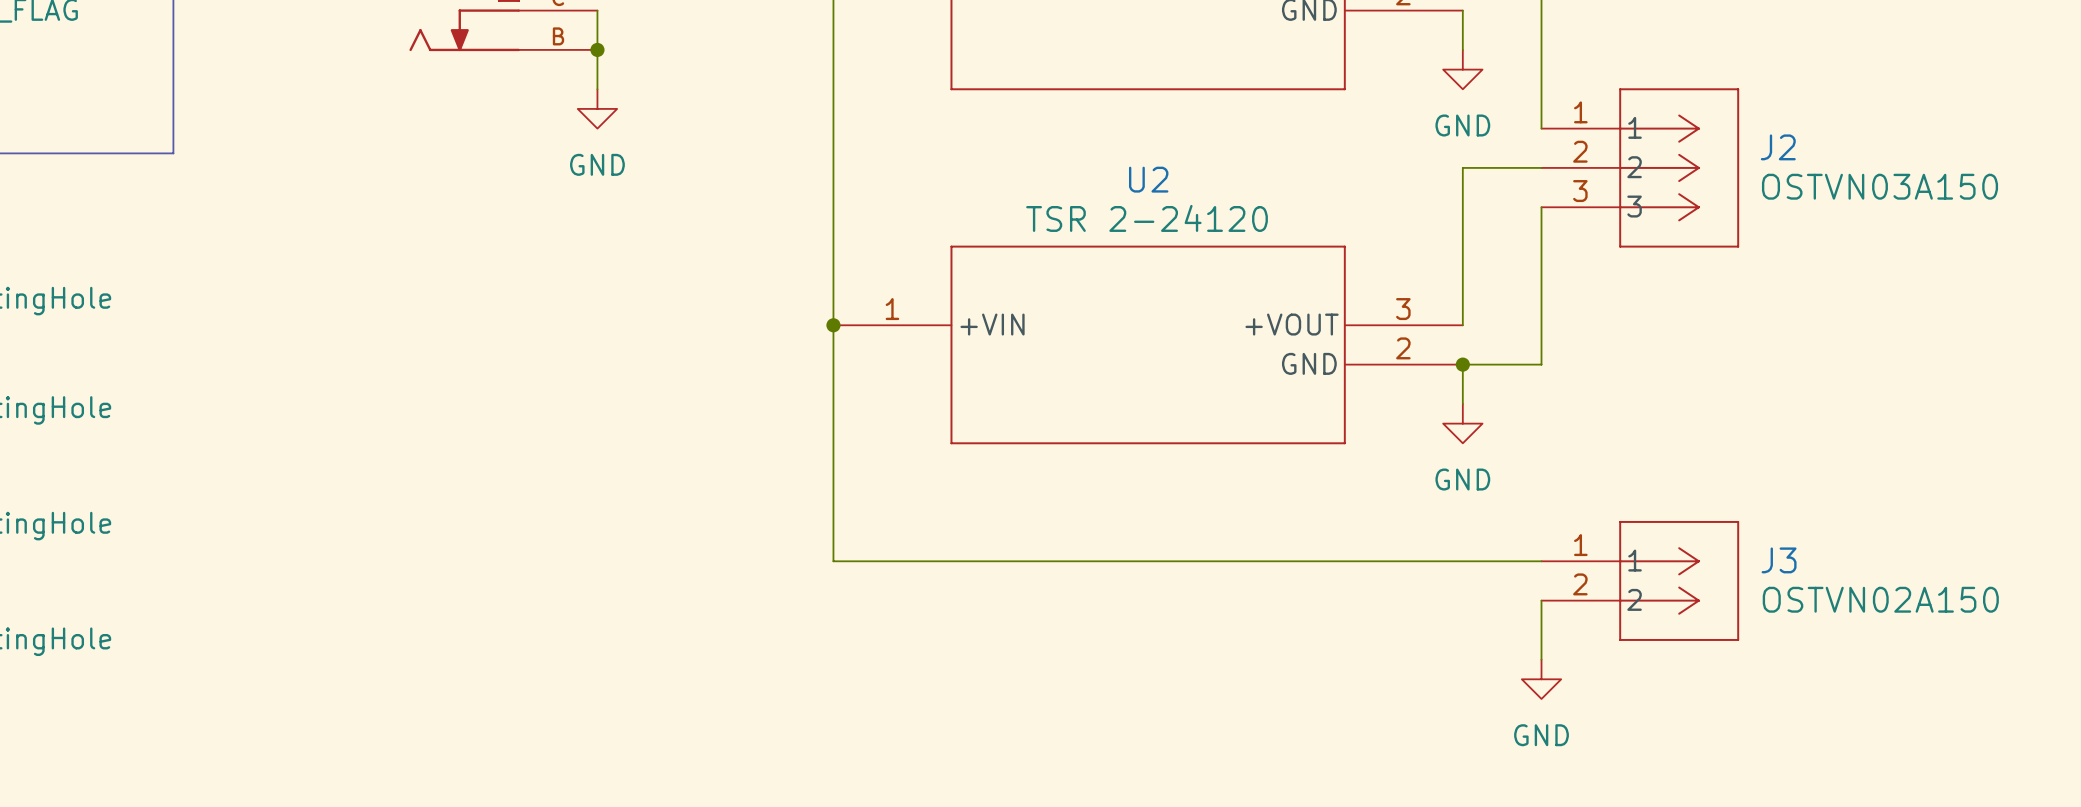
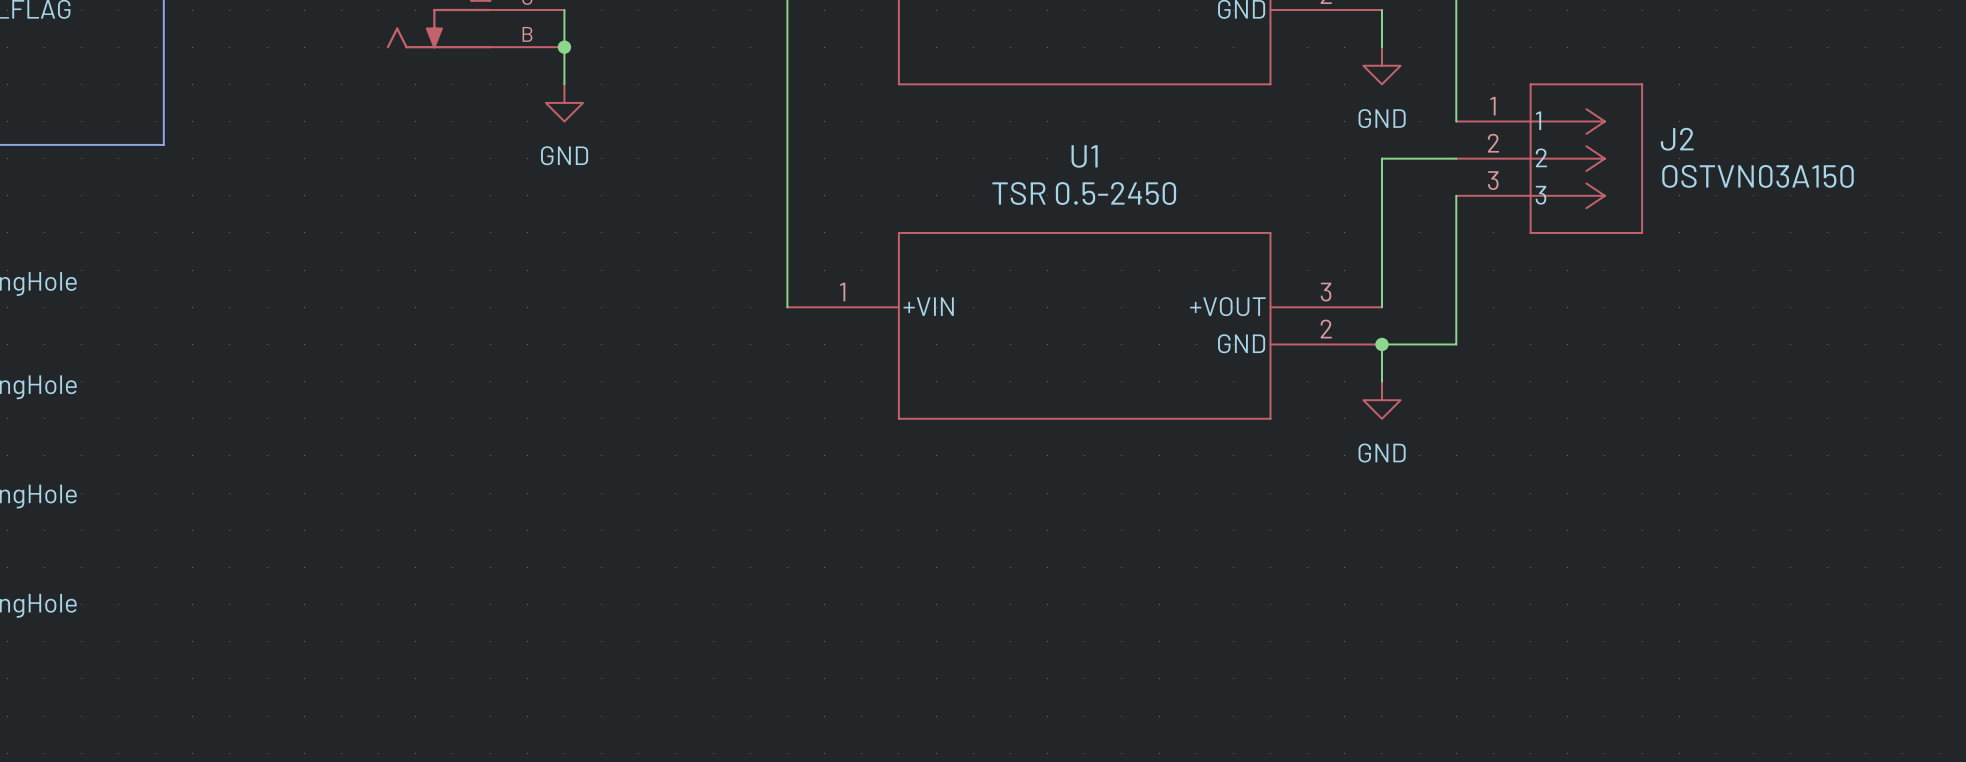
U2 name: U2 (1148, 179) -> U1 (1084, 156)
U2 value: TSR 2-24120 (1147, 218) -> TSR 0.5-2450 (1084, 193)
wire: (833, 325) (833, 561) (1541, 561) -> none
junction: (833, 325) -> none
J3: OSTVN02A150 (1640, 580) -> none
wire: (1541, 600) (1541, 659) -> none
power symbol: GND (1541, 679) -> none

